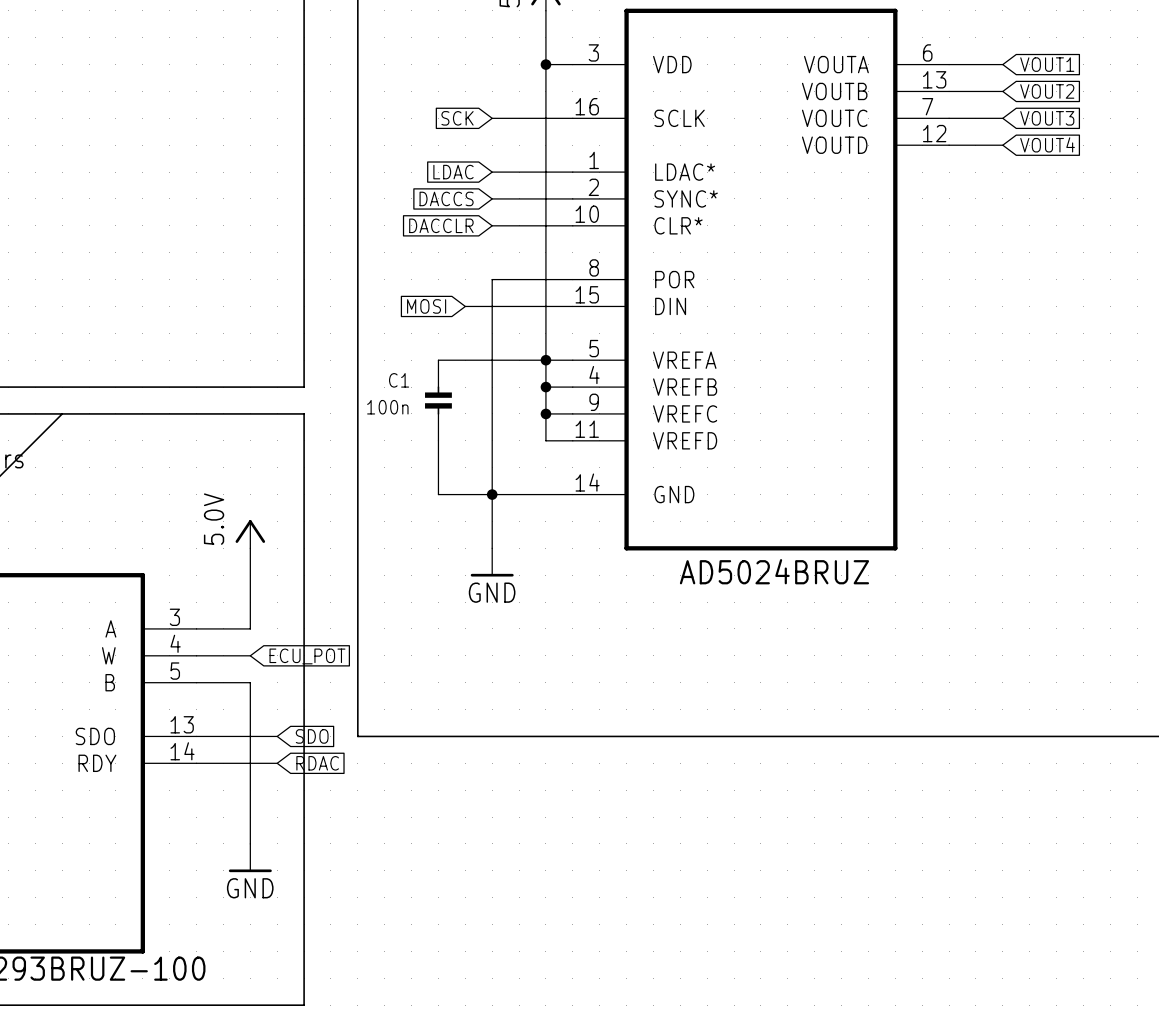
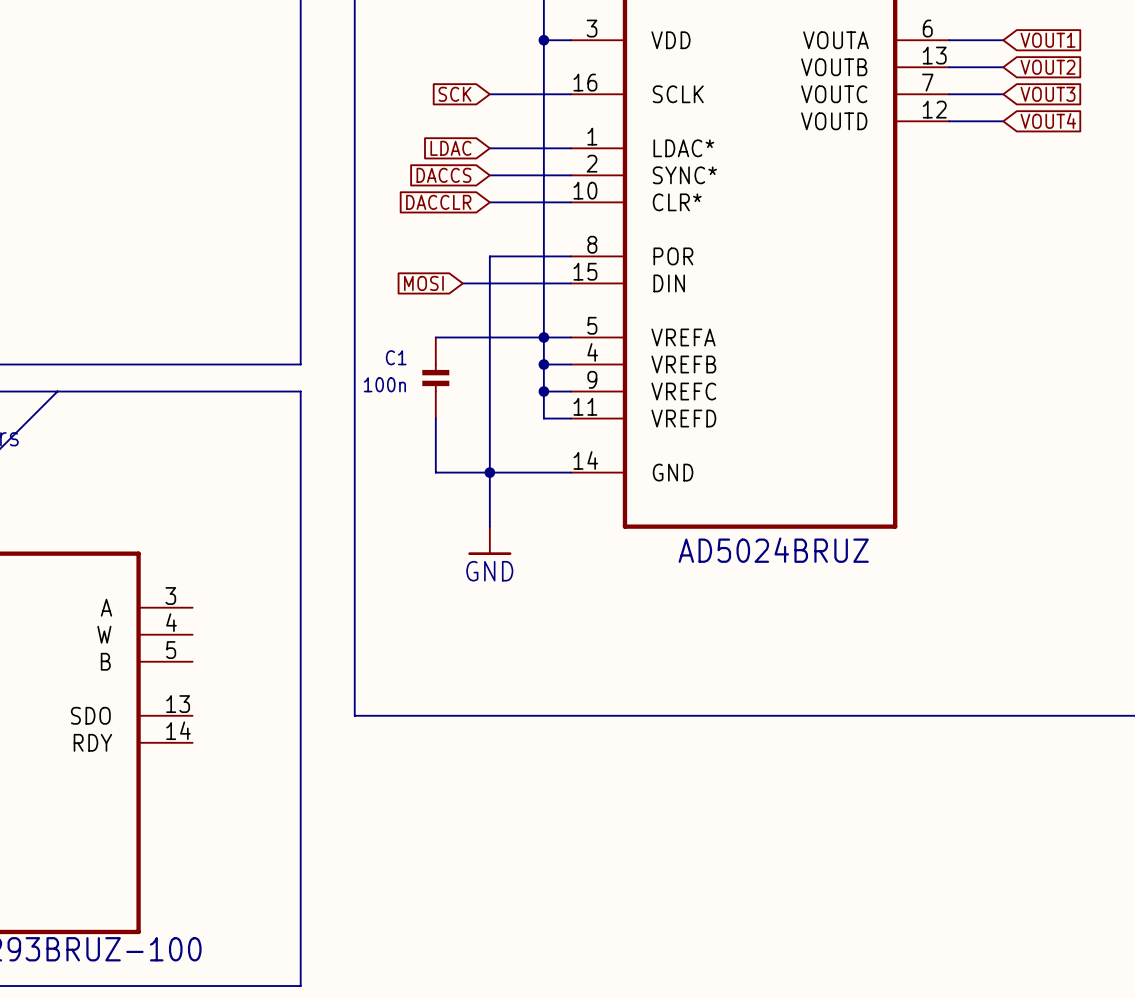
power symbol: 5.0V (250, 534) -> none
wire: (250, 548) (250, 628) (196, 628) -> none
wire: (196, 655) (250, 655) -> none
global label: ECU_POT (307, 656) -> none
wire: (196, 682) (250, 682) (250, 843) -> none
wire: (196, 736) (277, 736) -> none
global label: SDO (312, 736) -> none
wire: (196, 763) (277, 763) -> none
global label: RDAC (317, 763) -> none
power symbol: GND (250, 858) -> none

